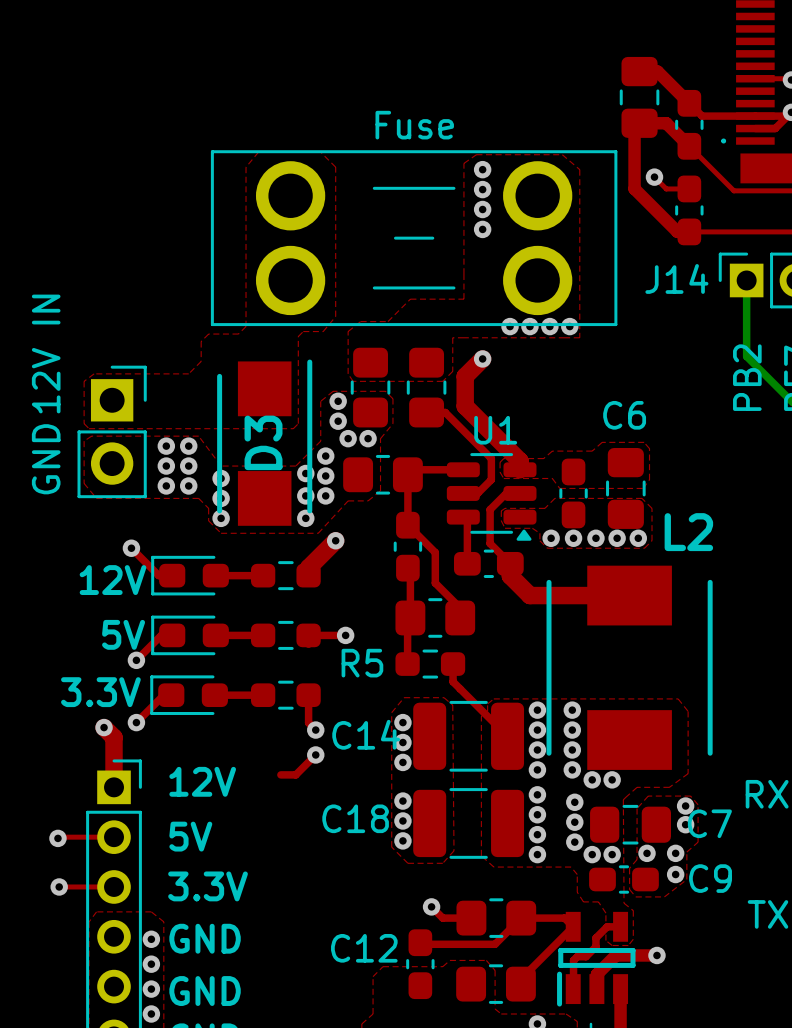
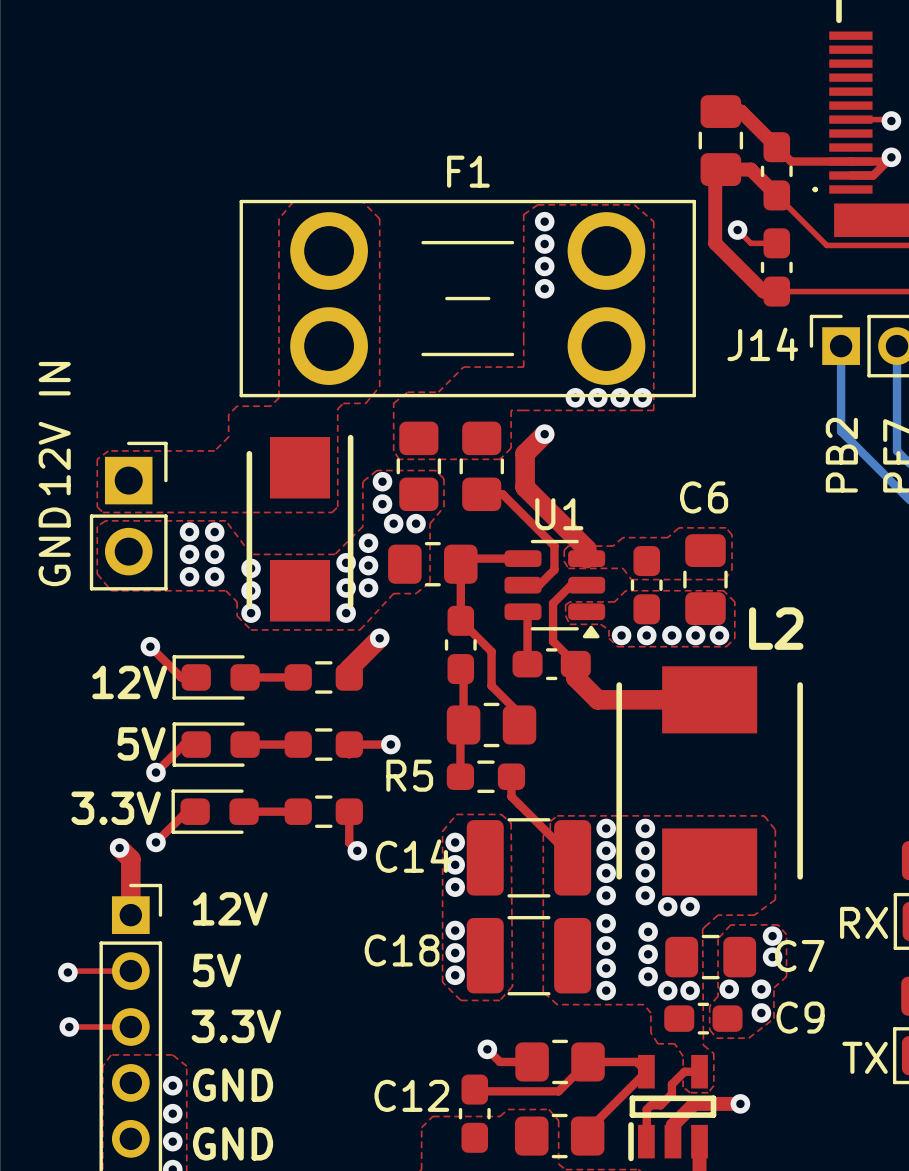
Fuse name: Fuse (414, 125) -> F1 (468, 171)
D3 name: D3 (263, 442) -> none
top track: (315, 754) (295, 774) (280, 774) -> none
via: (315, 754) -> none

